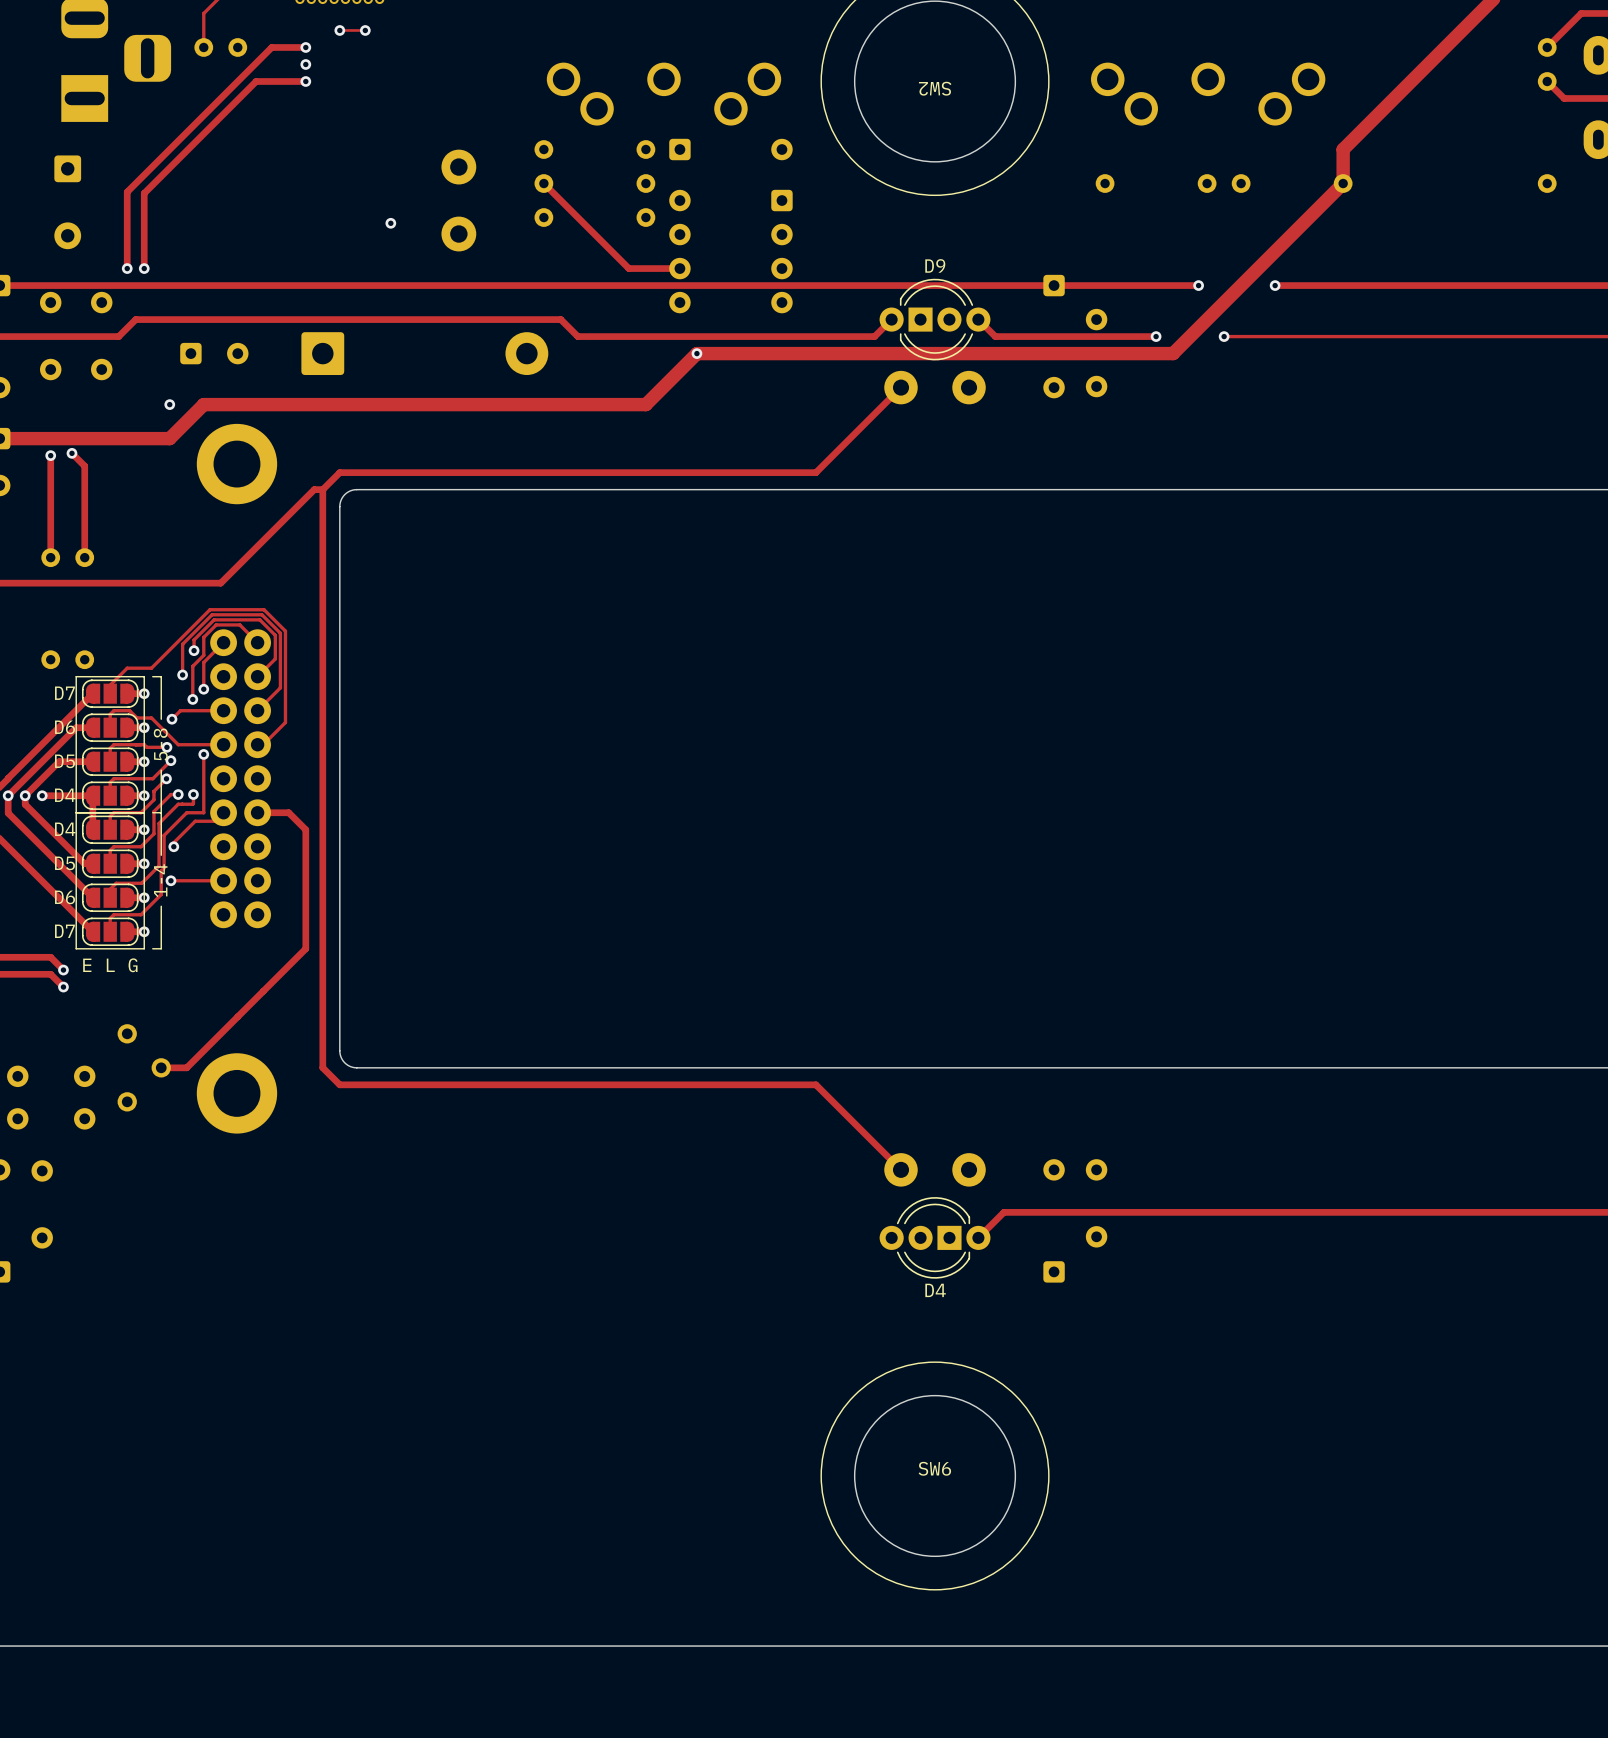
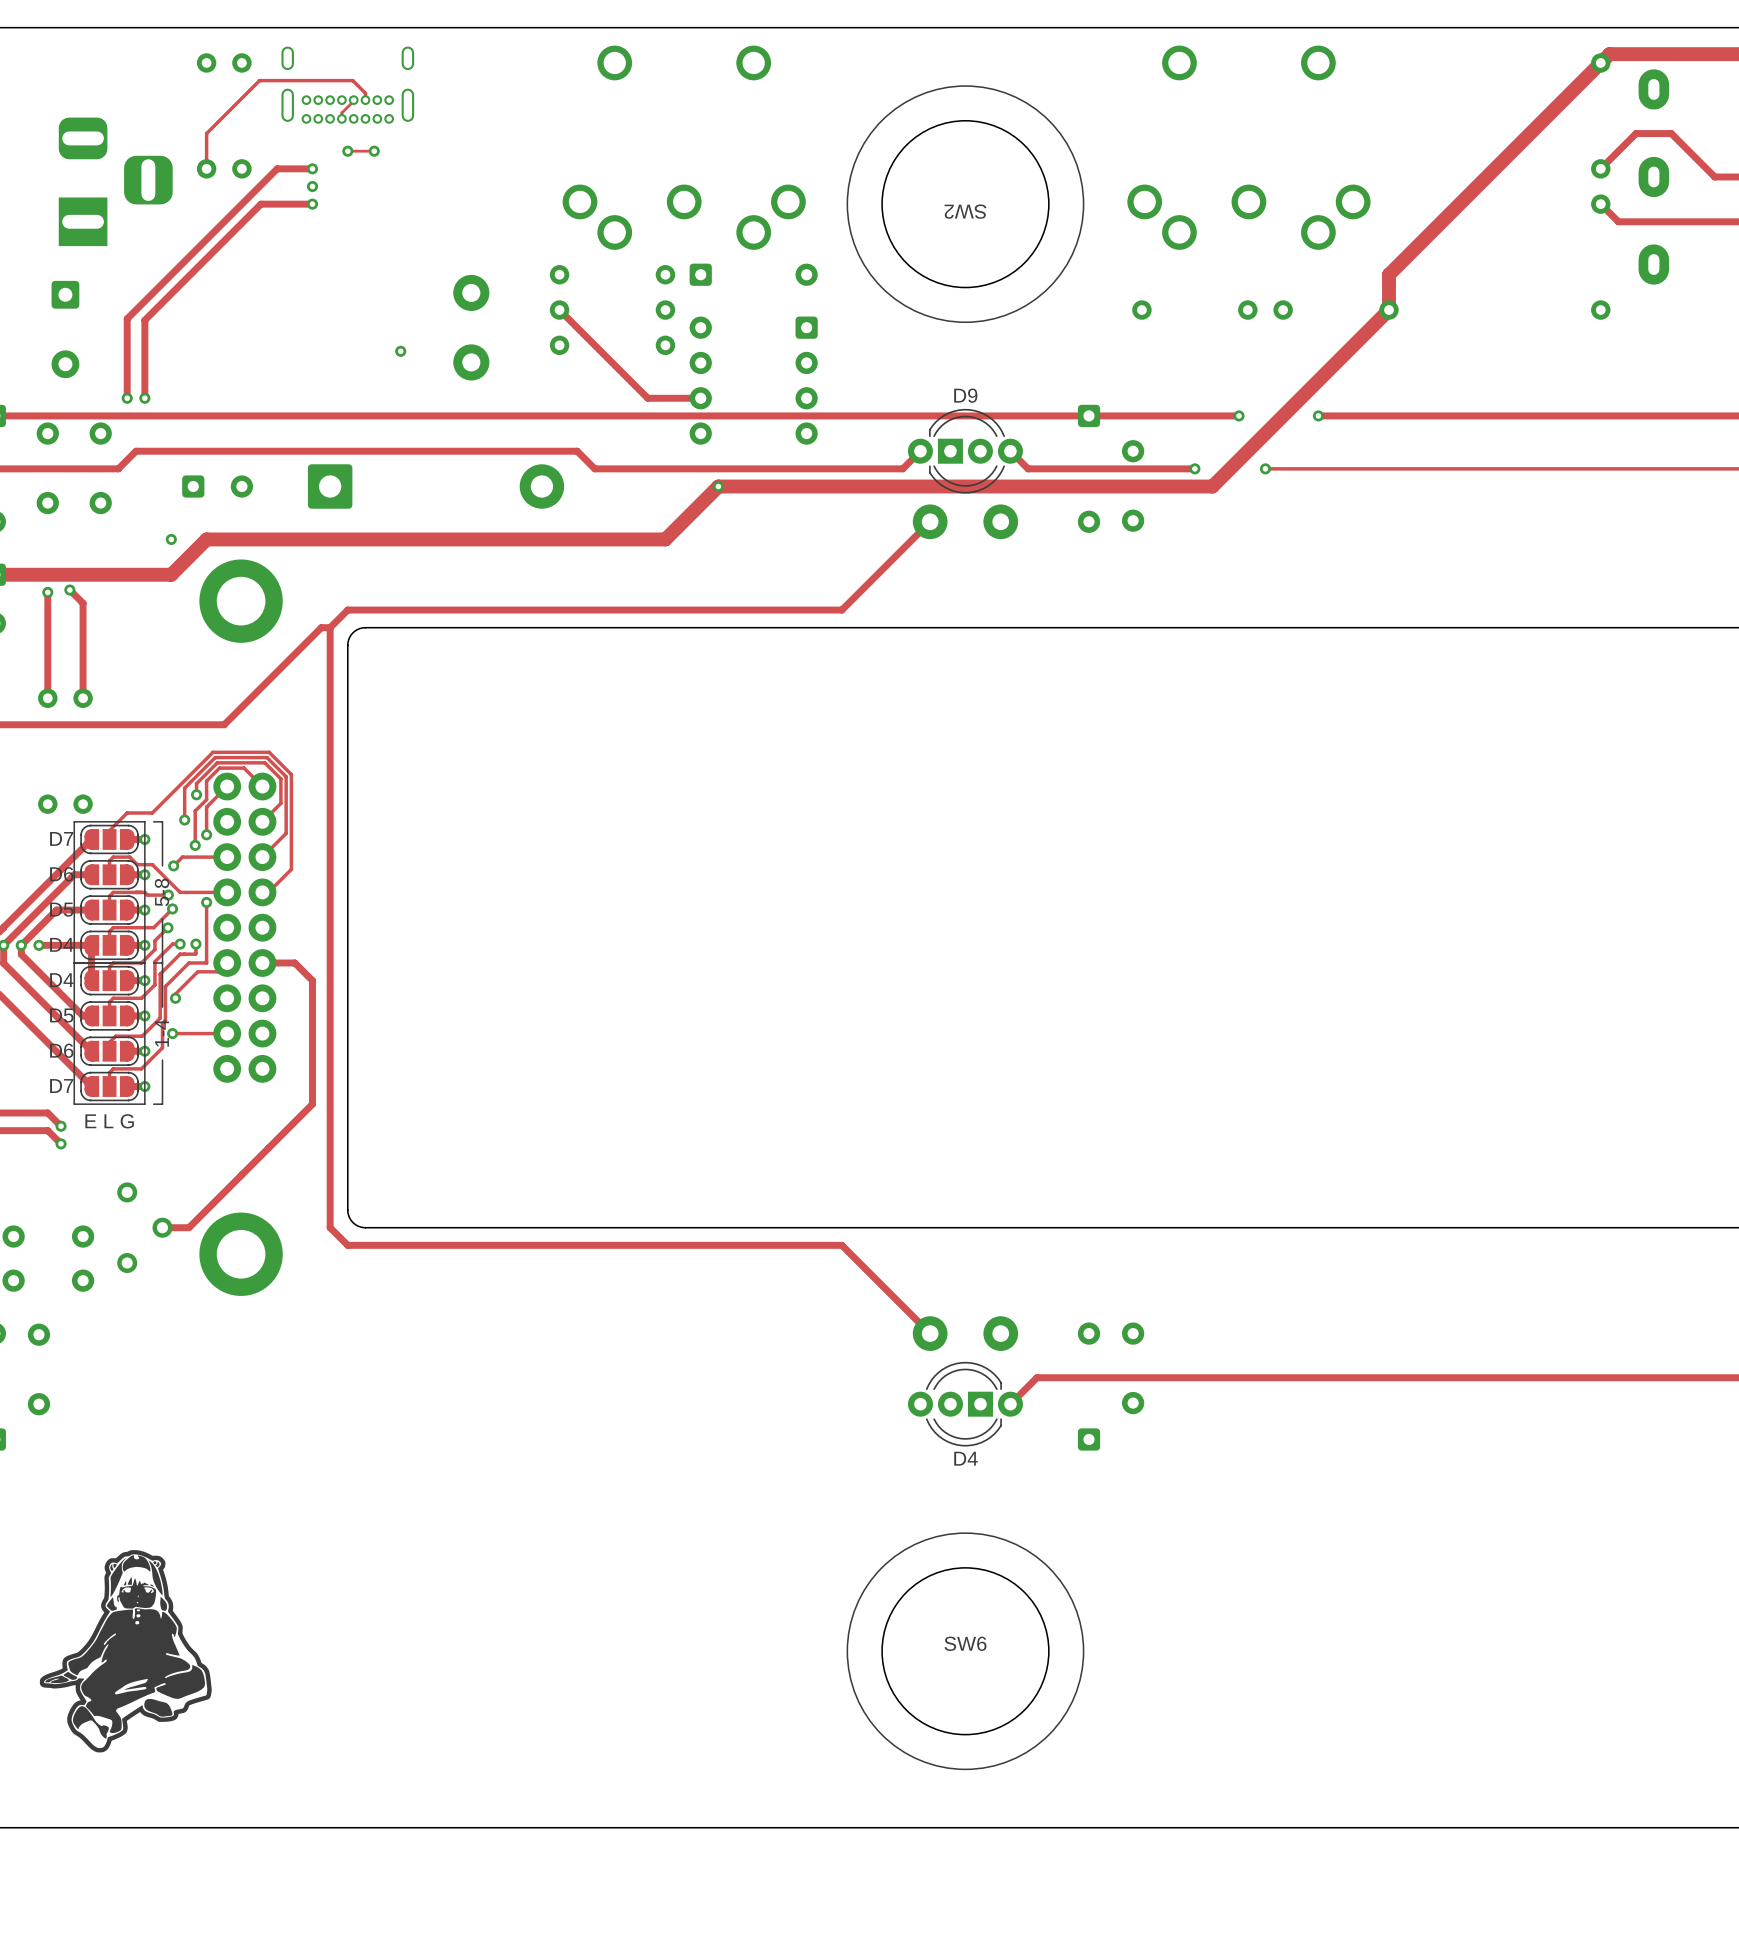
drawing: none -> [39, 1550, 212, 1753]

